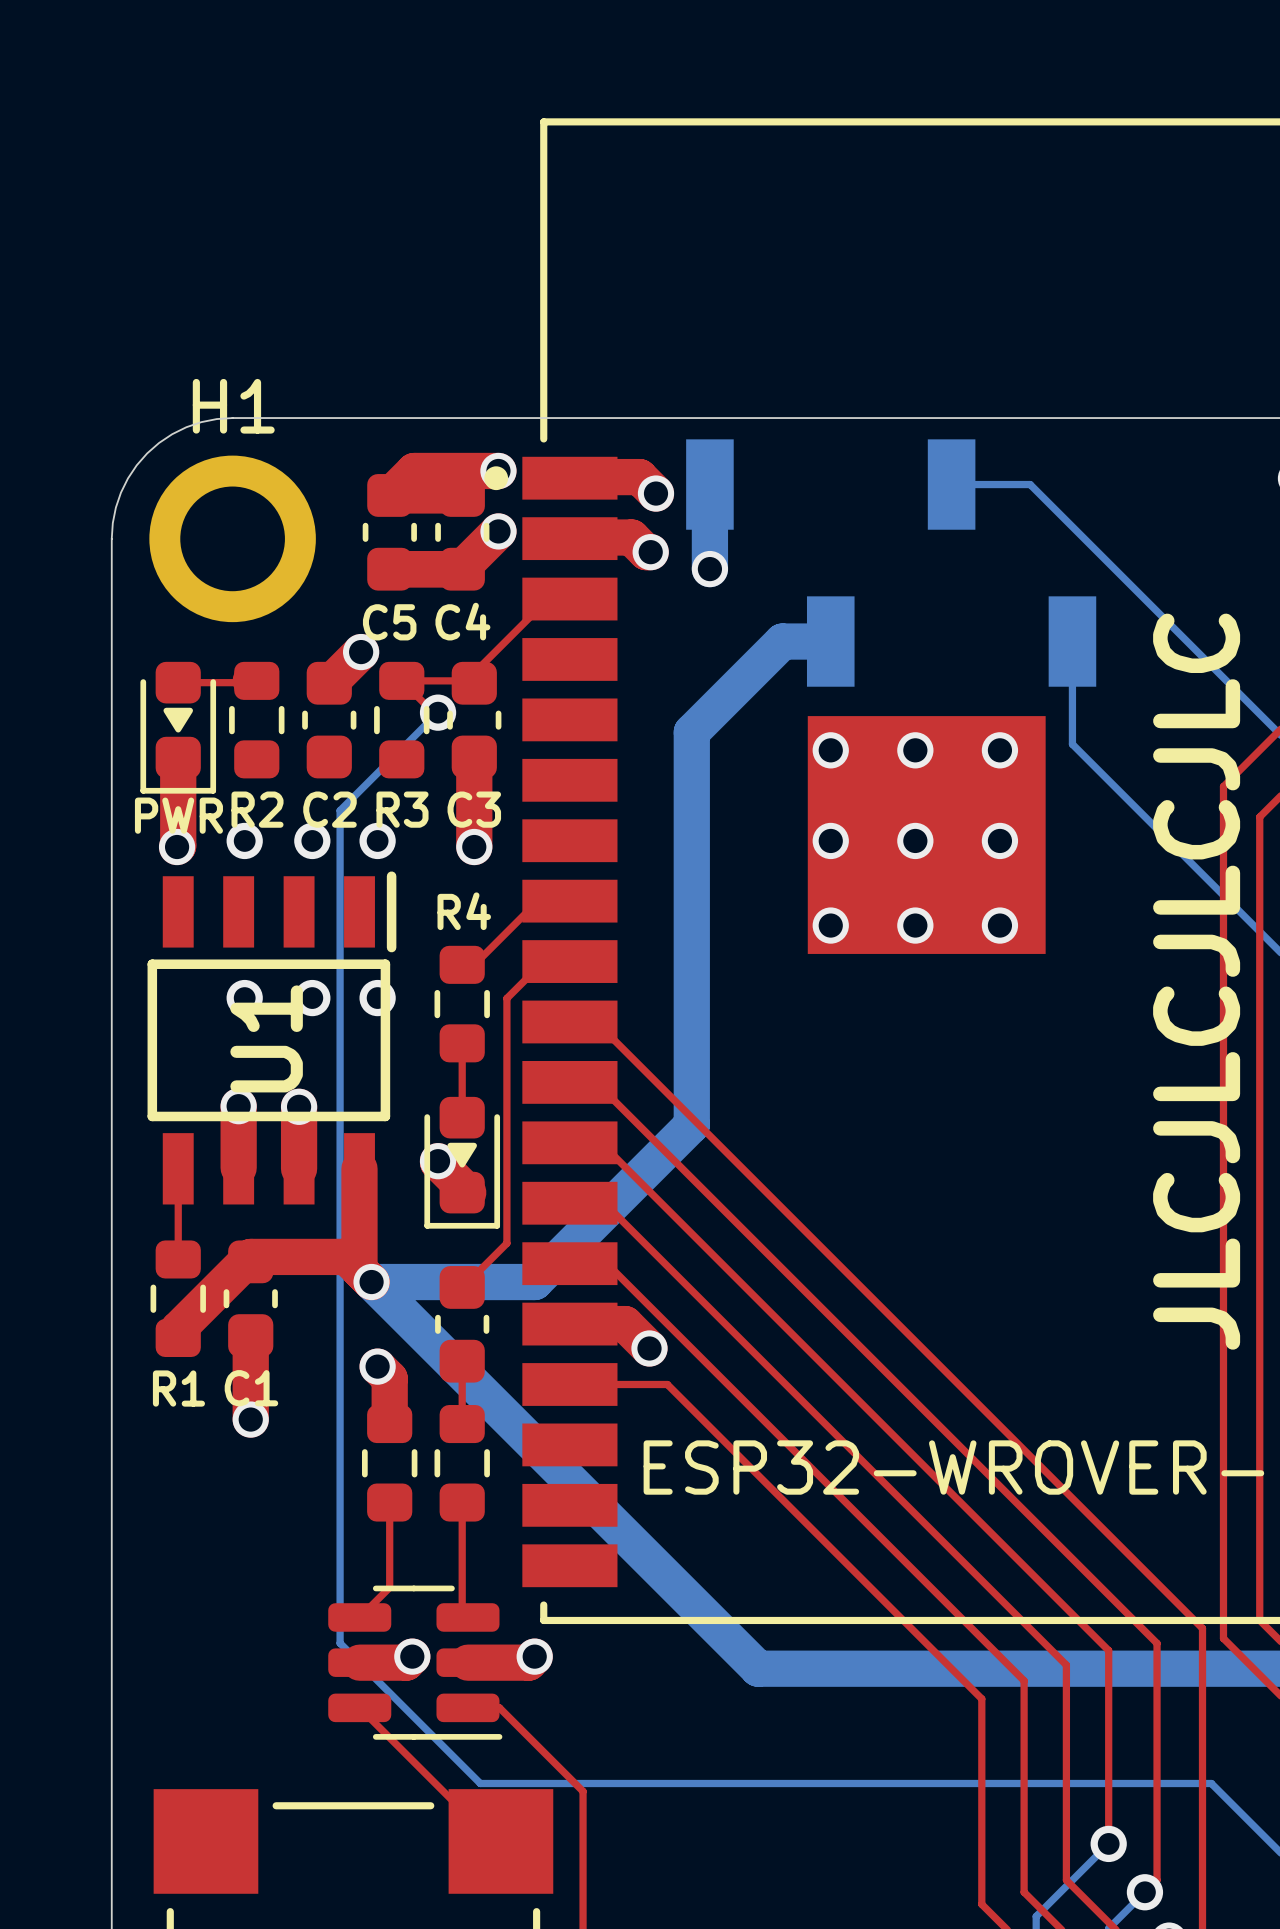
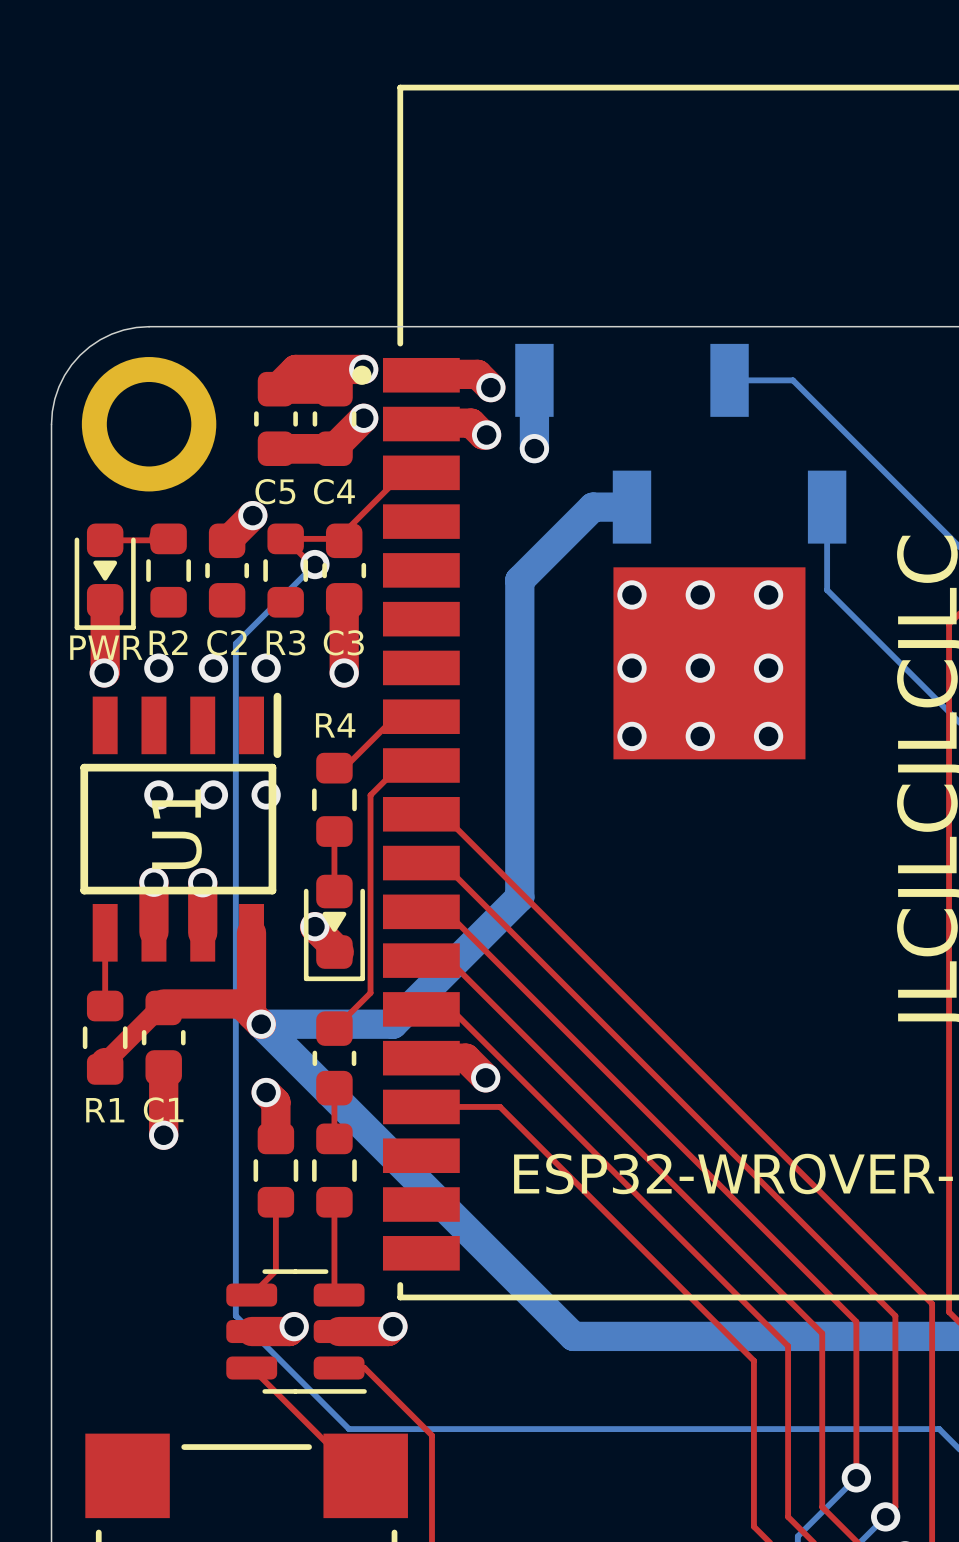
H1 name: H1 (233, 406) -> none
top track width: thick (250, 1256) (178, 1329) -> thin (163, 1003) (105, 1062)

